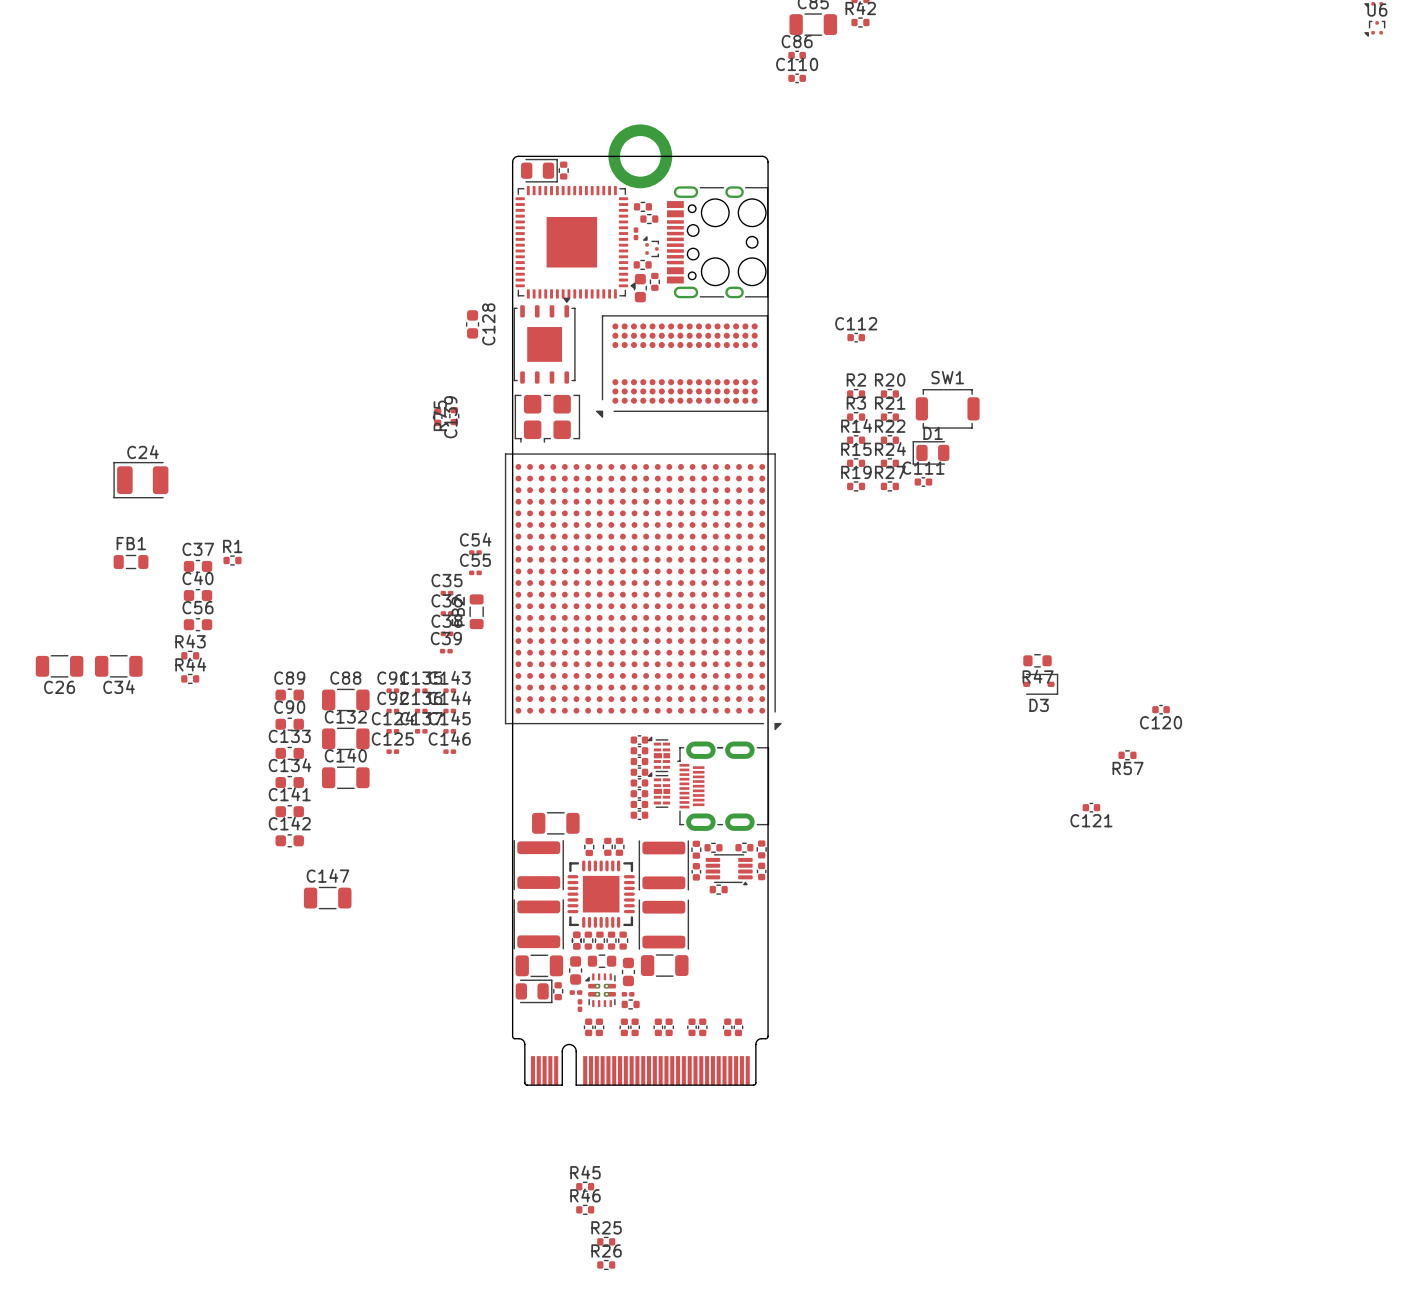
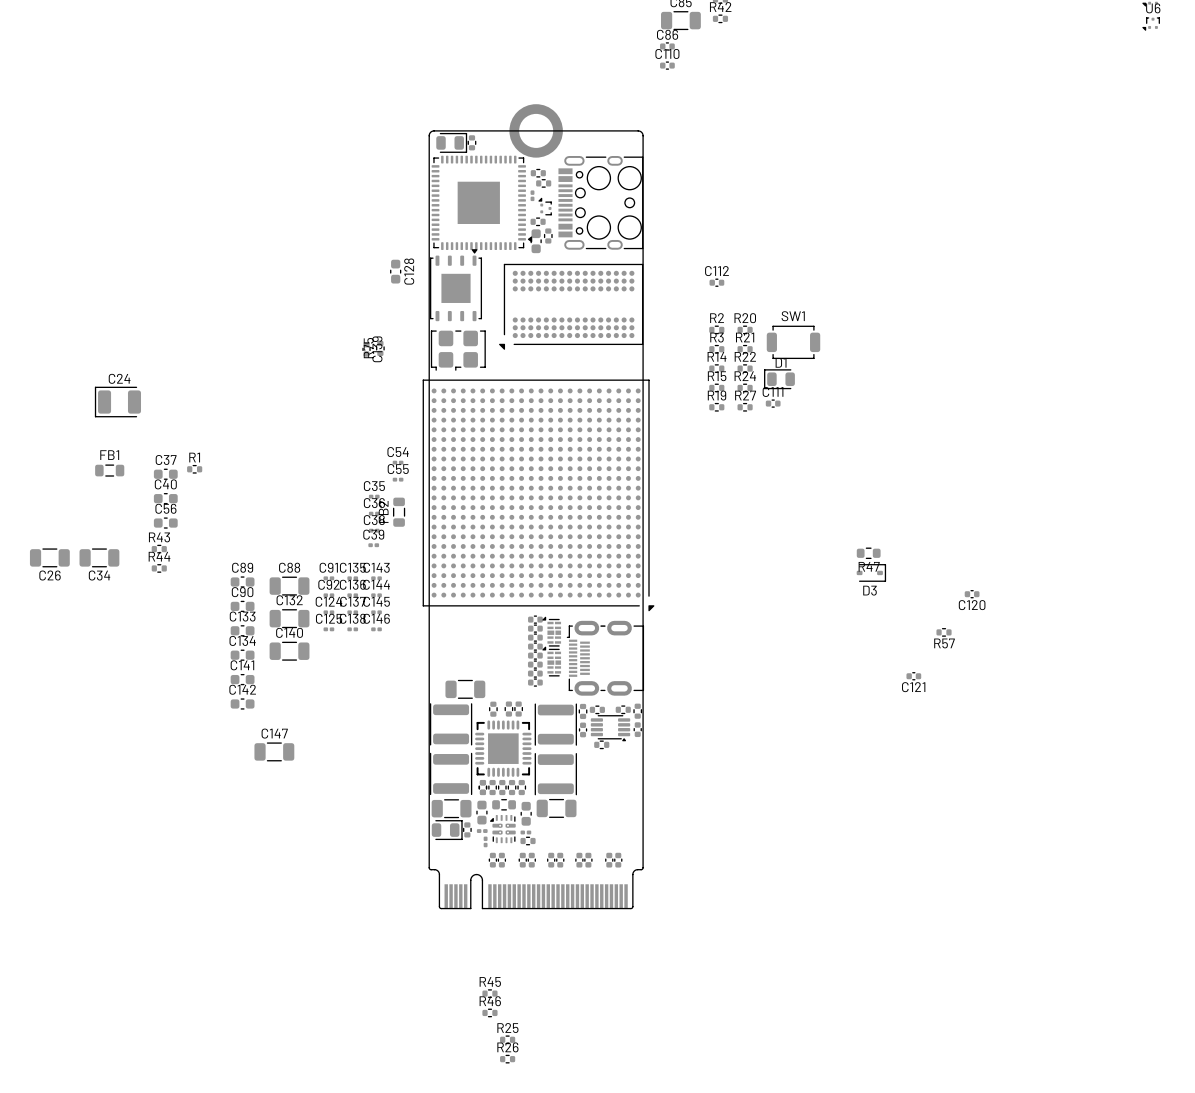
C138: none -> (352, 629)

